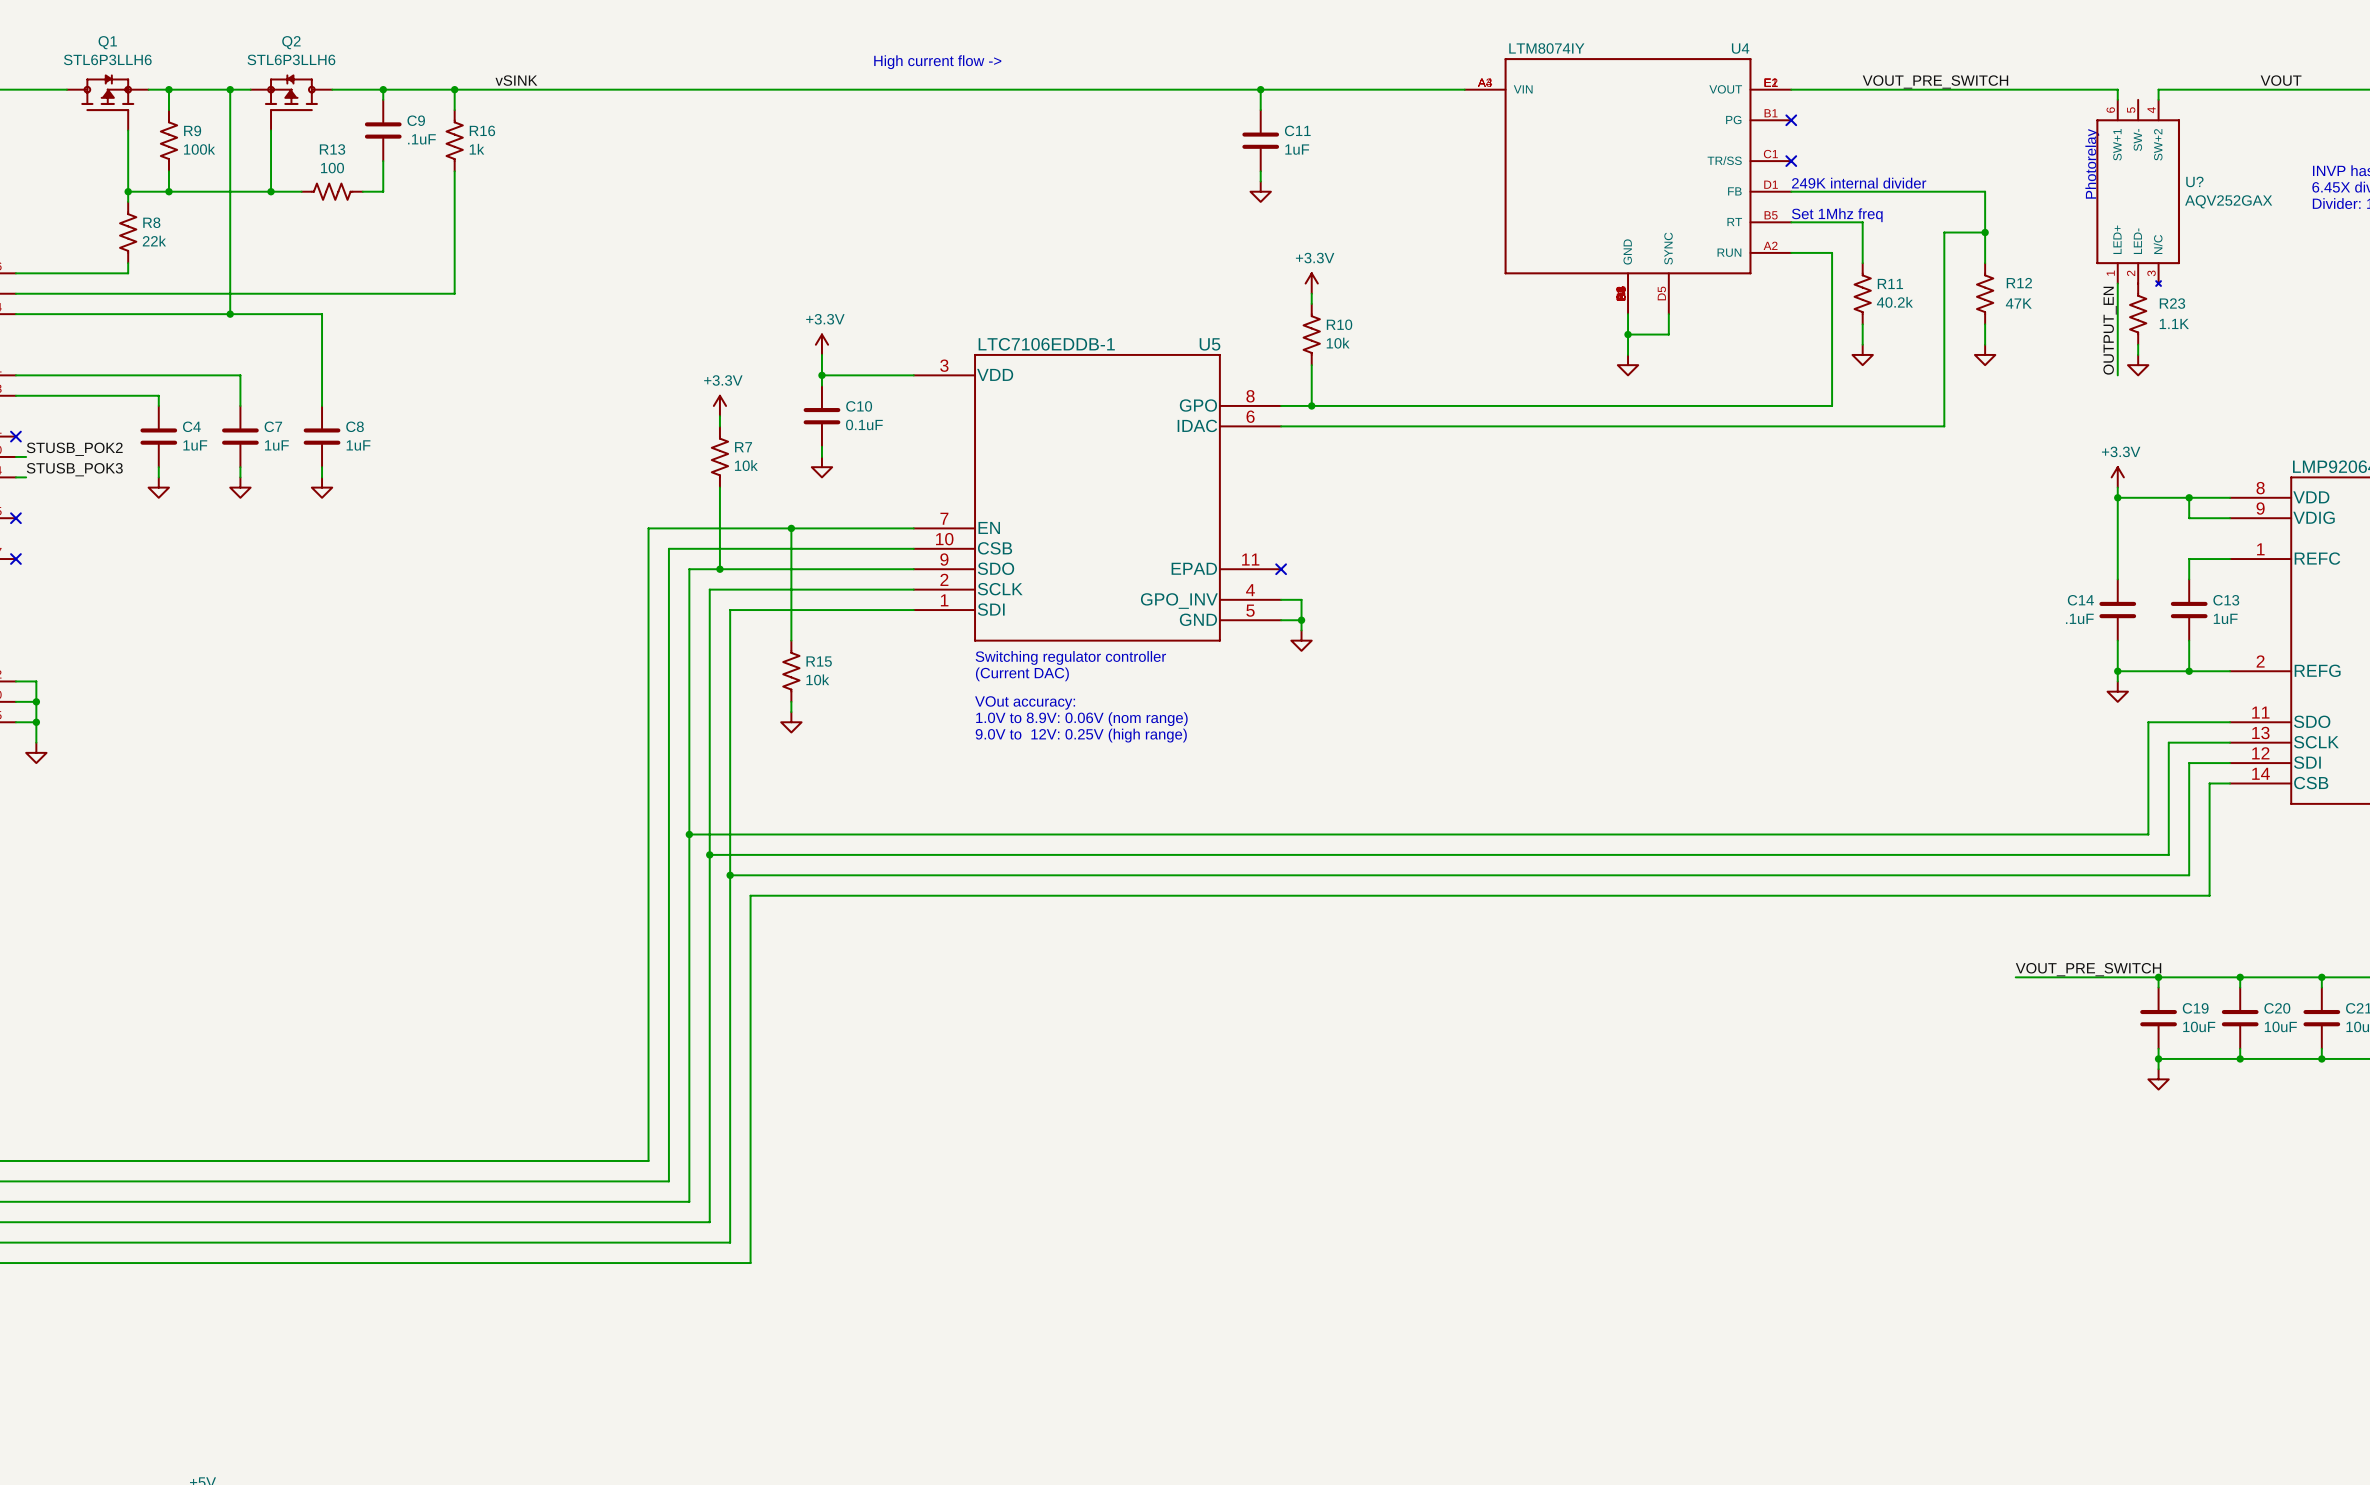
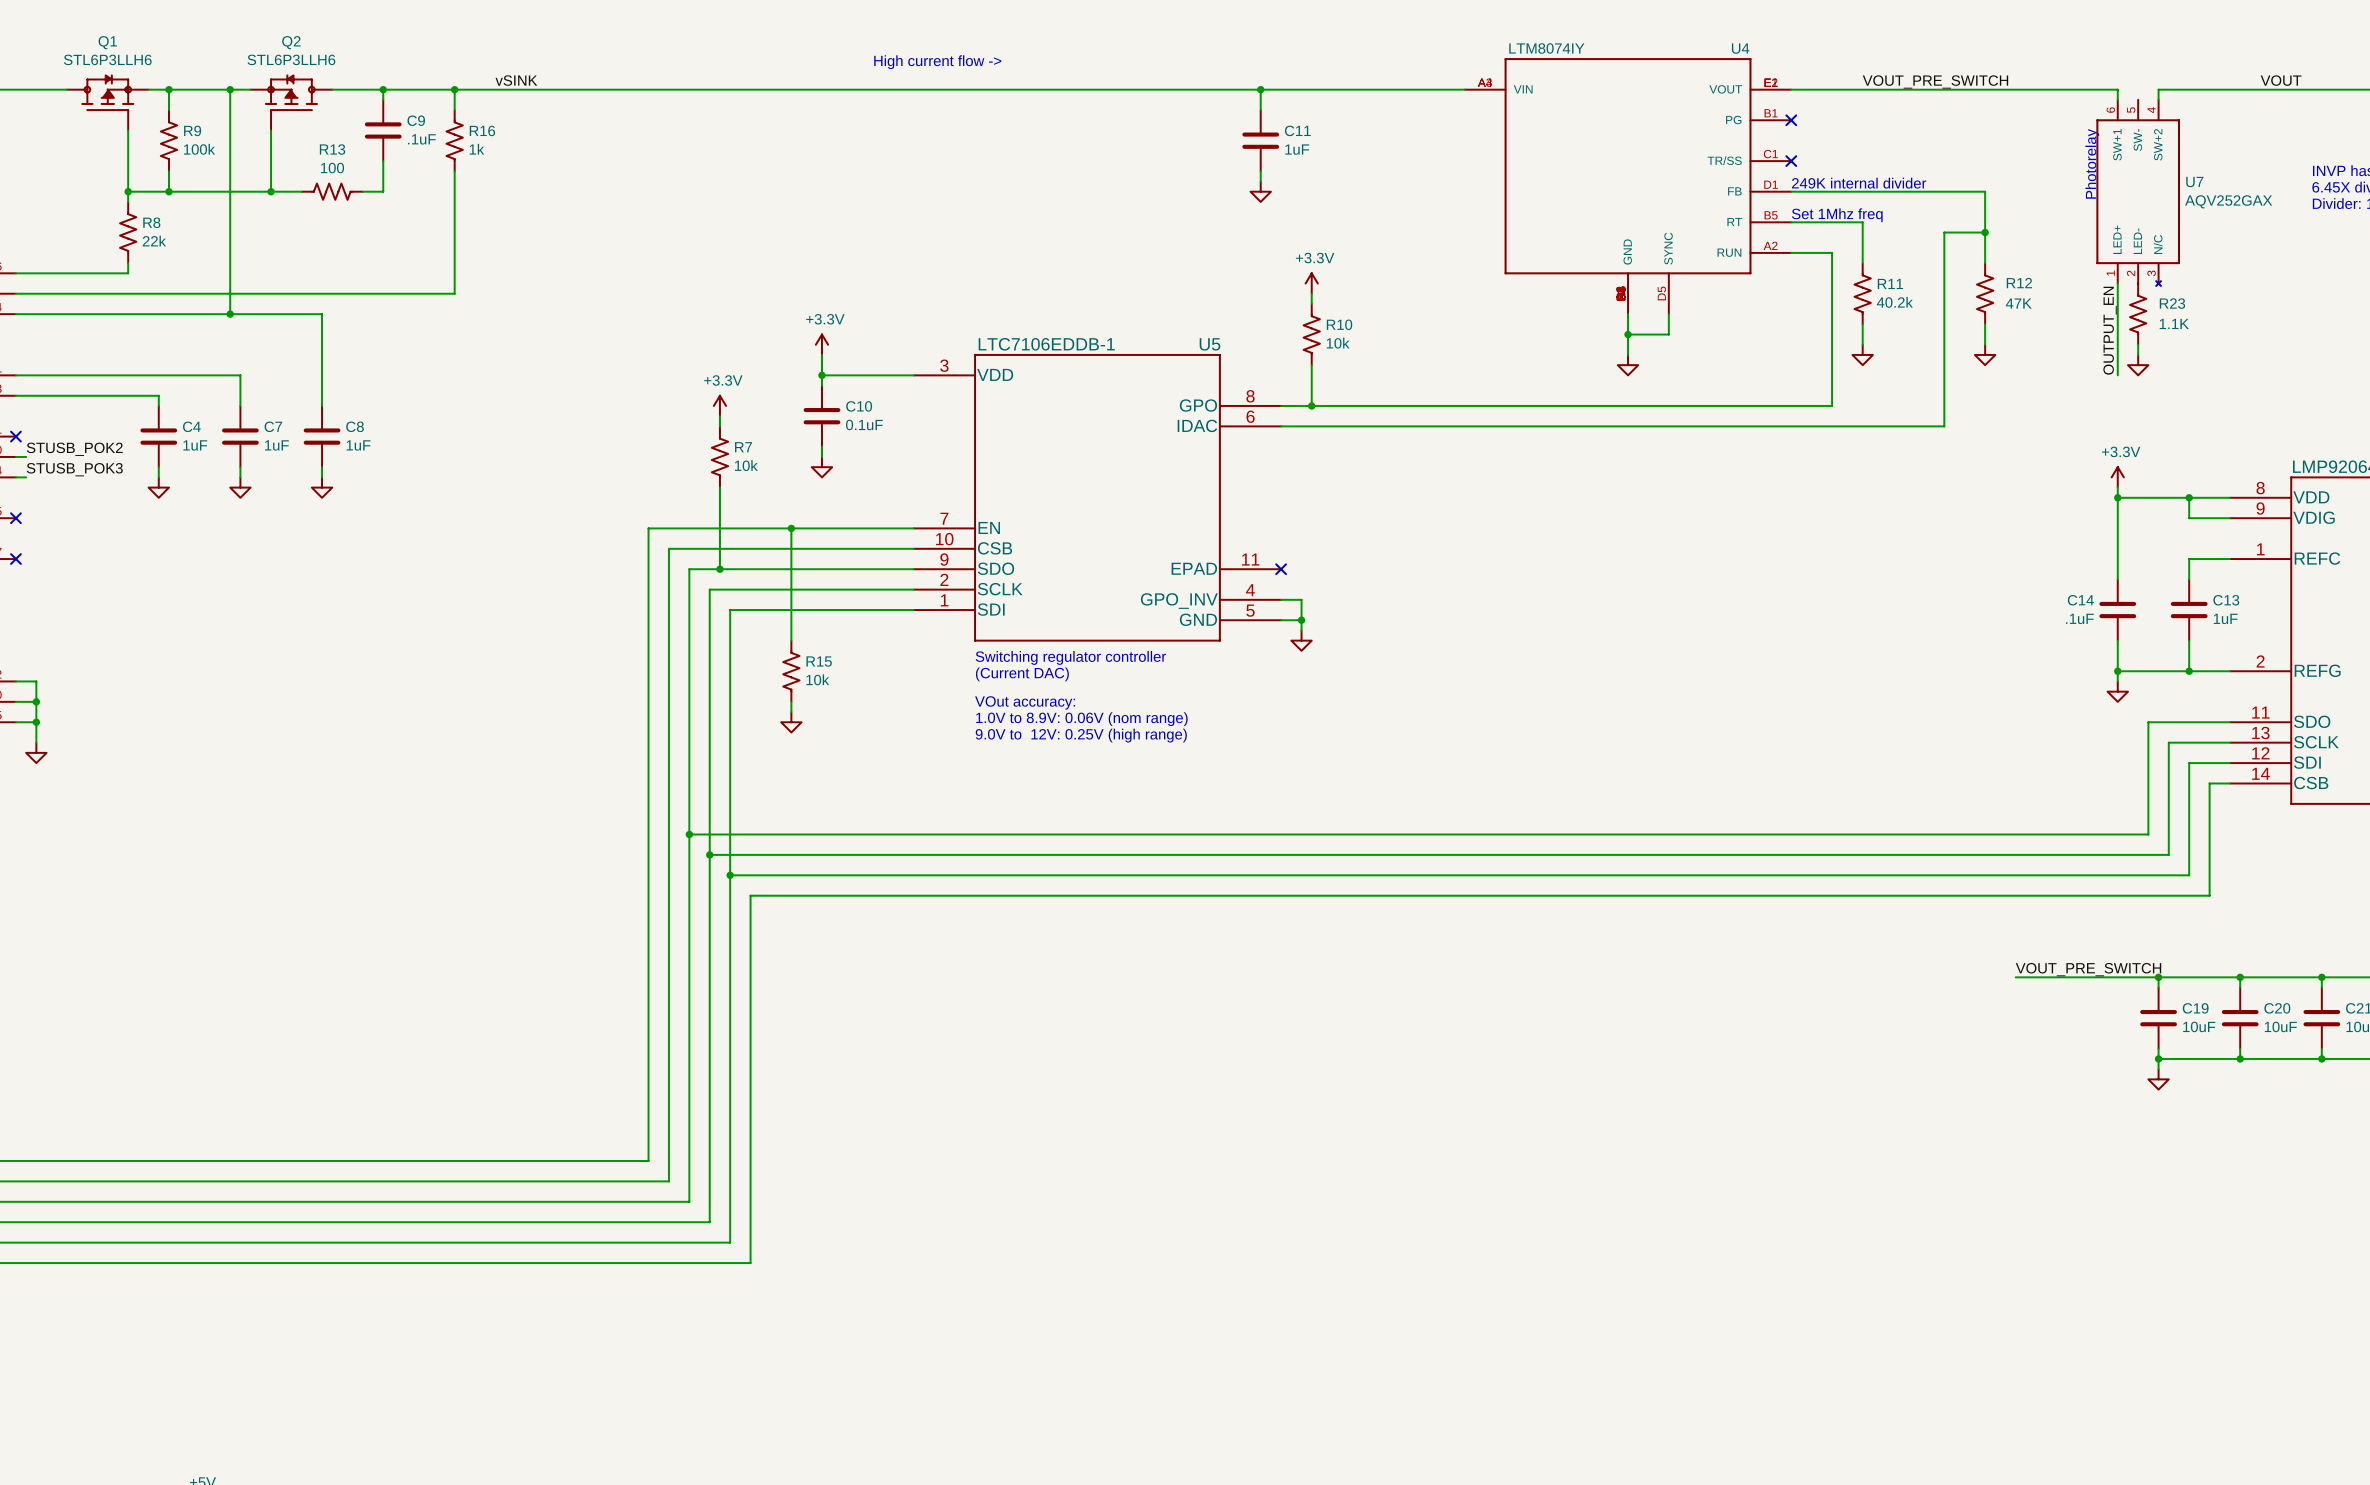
U? name: U? (2194, 181) -> U7 (2194, 182)

